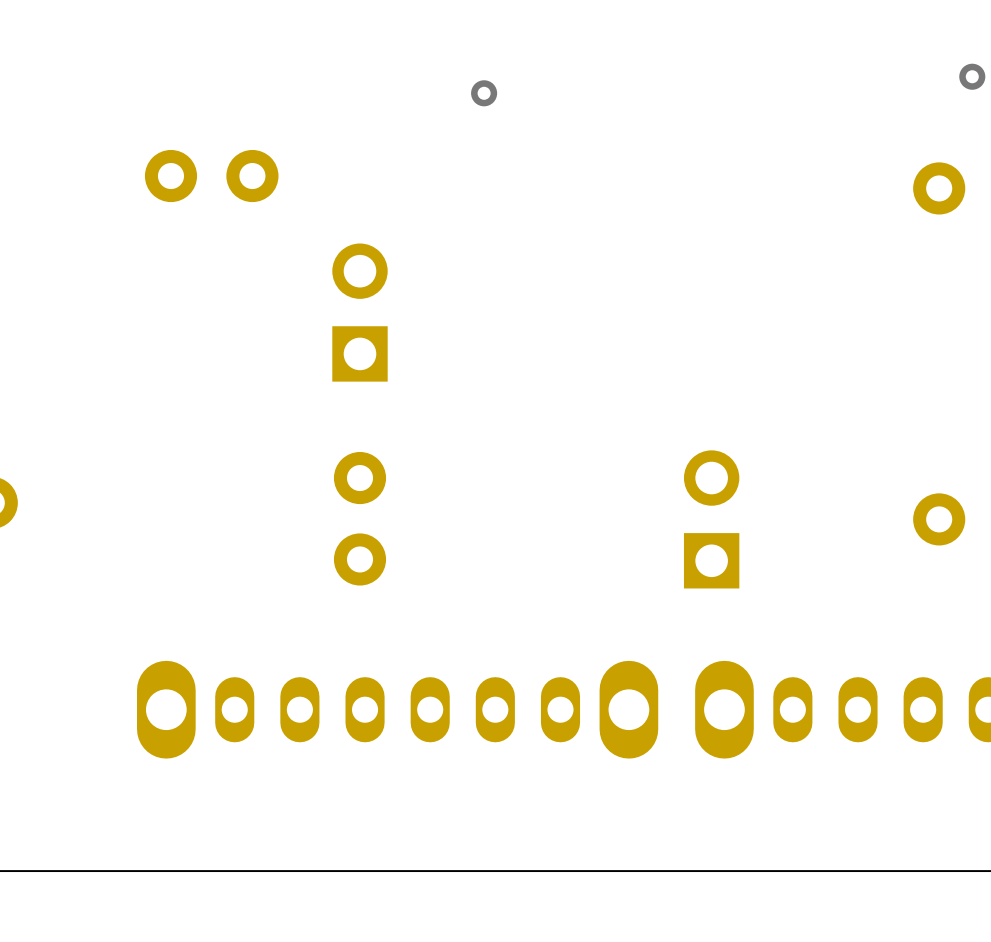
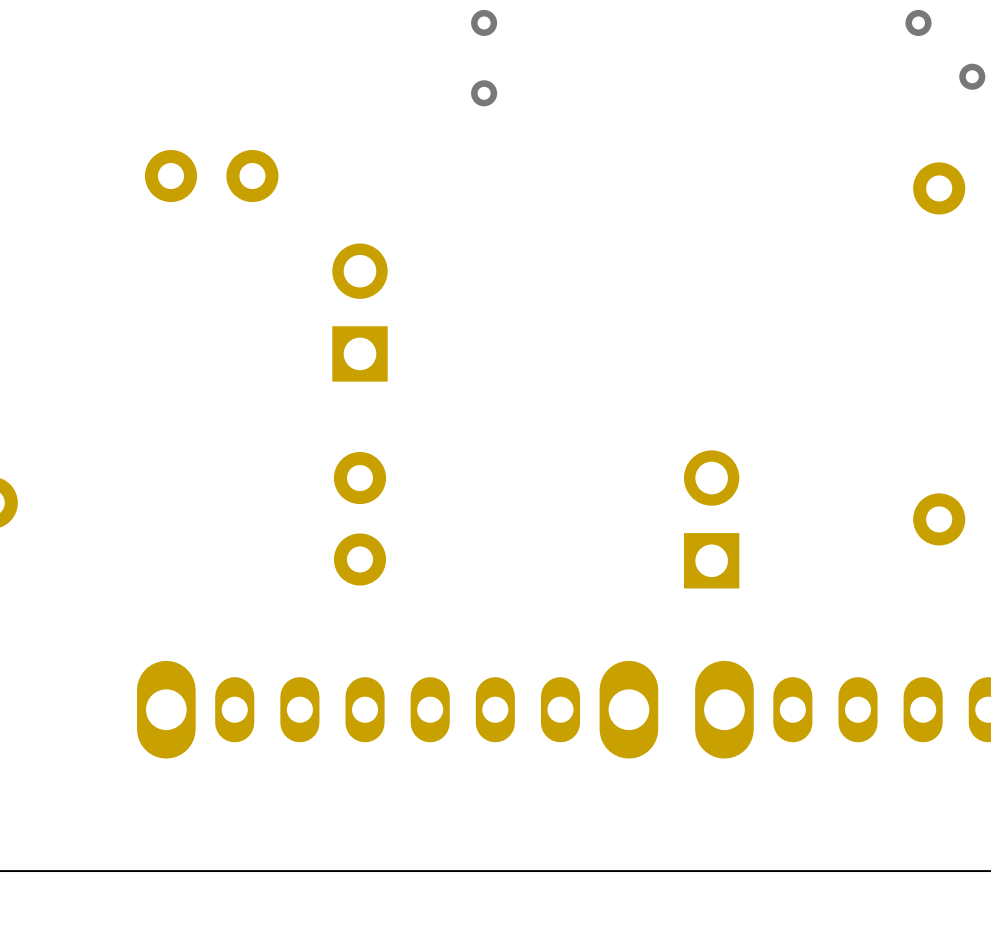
via: none -> (484, 22)
via: none -> (918, 22)

